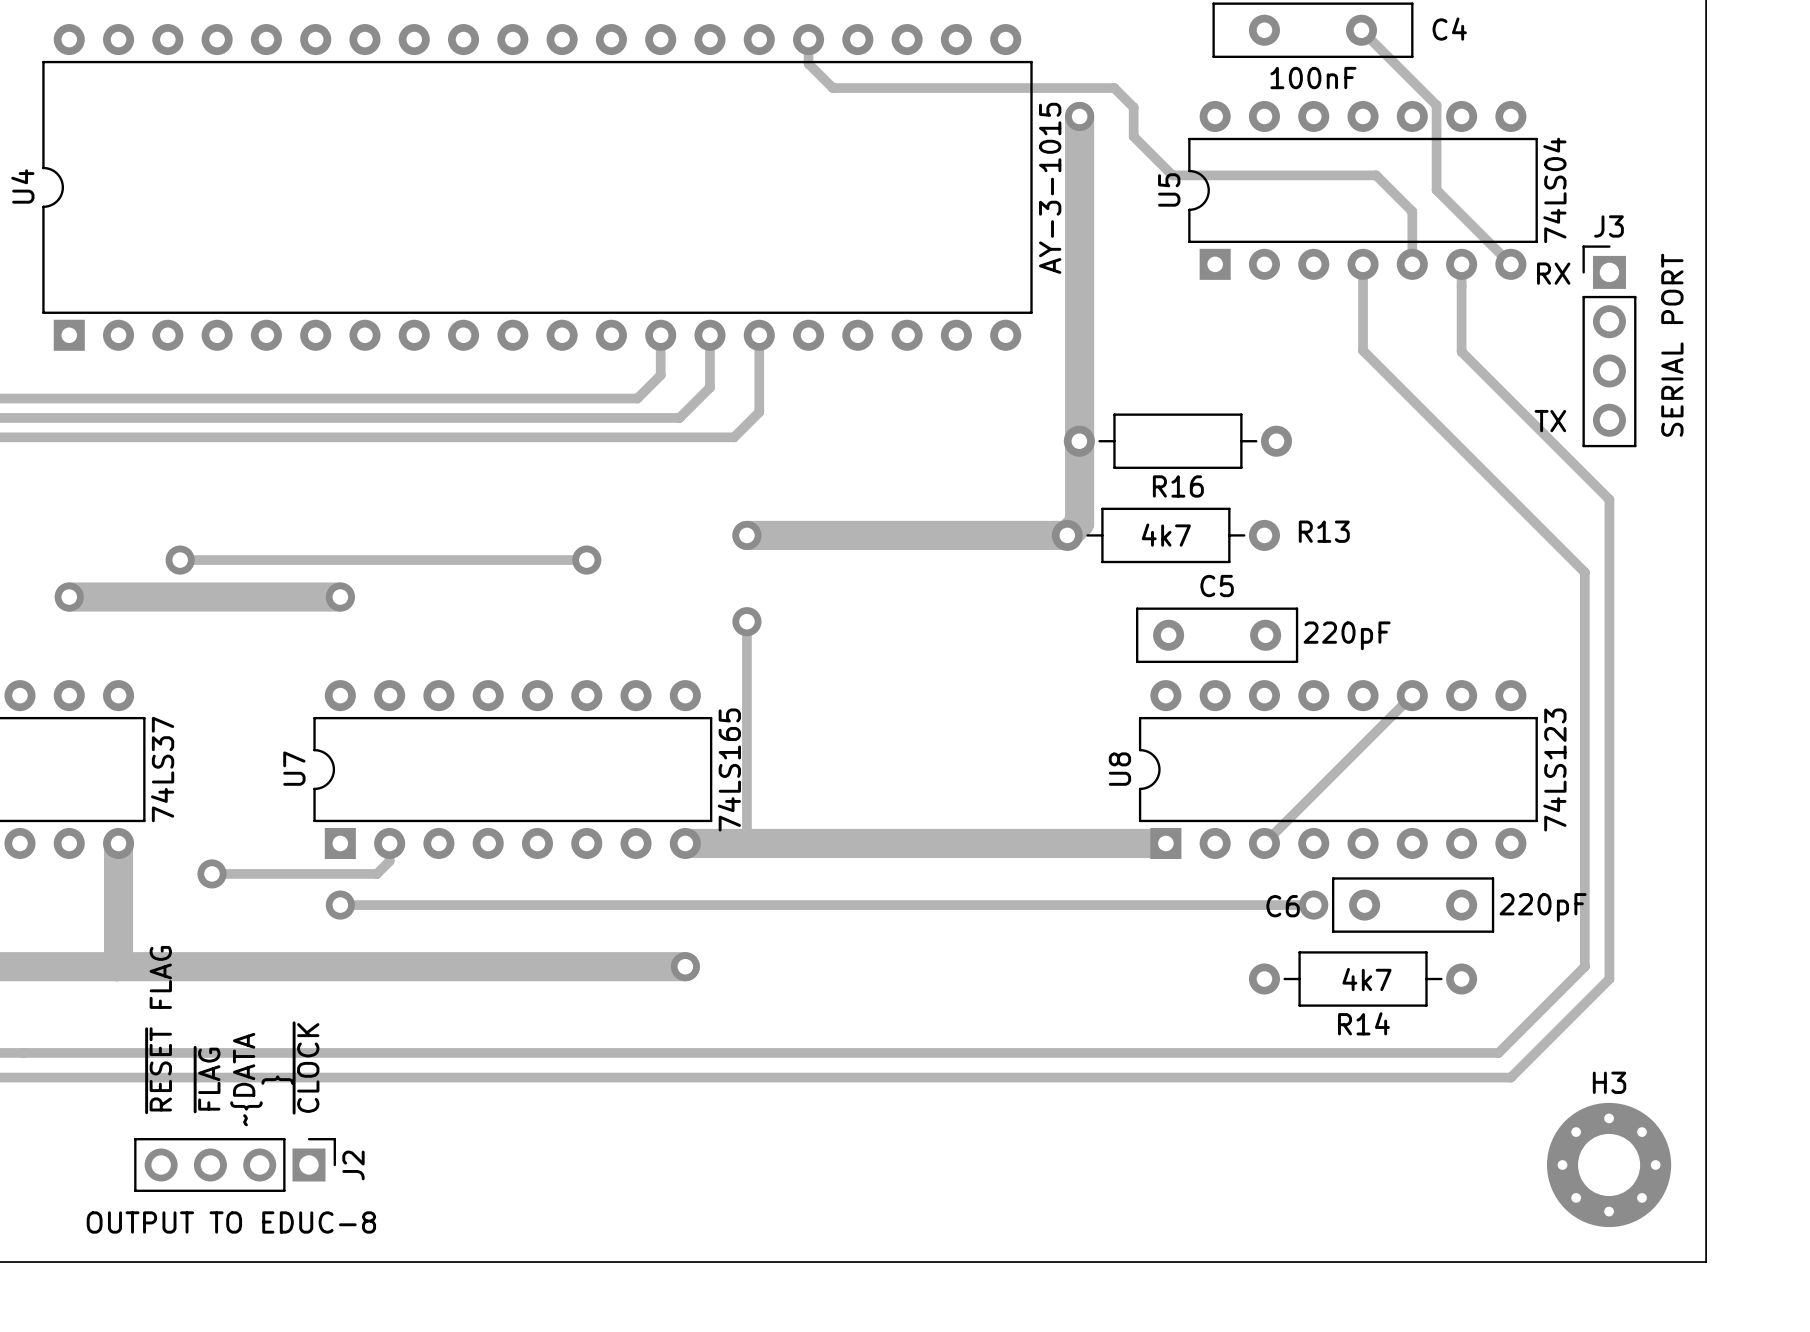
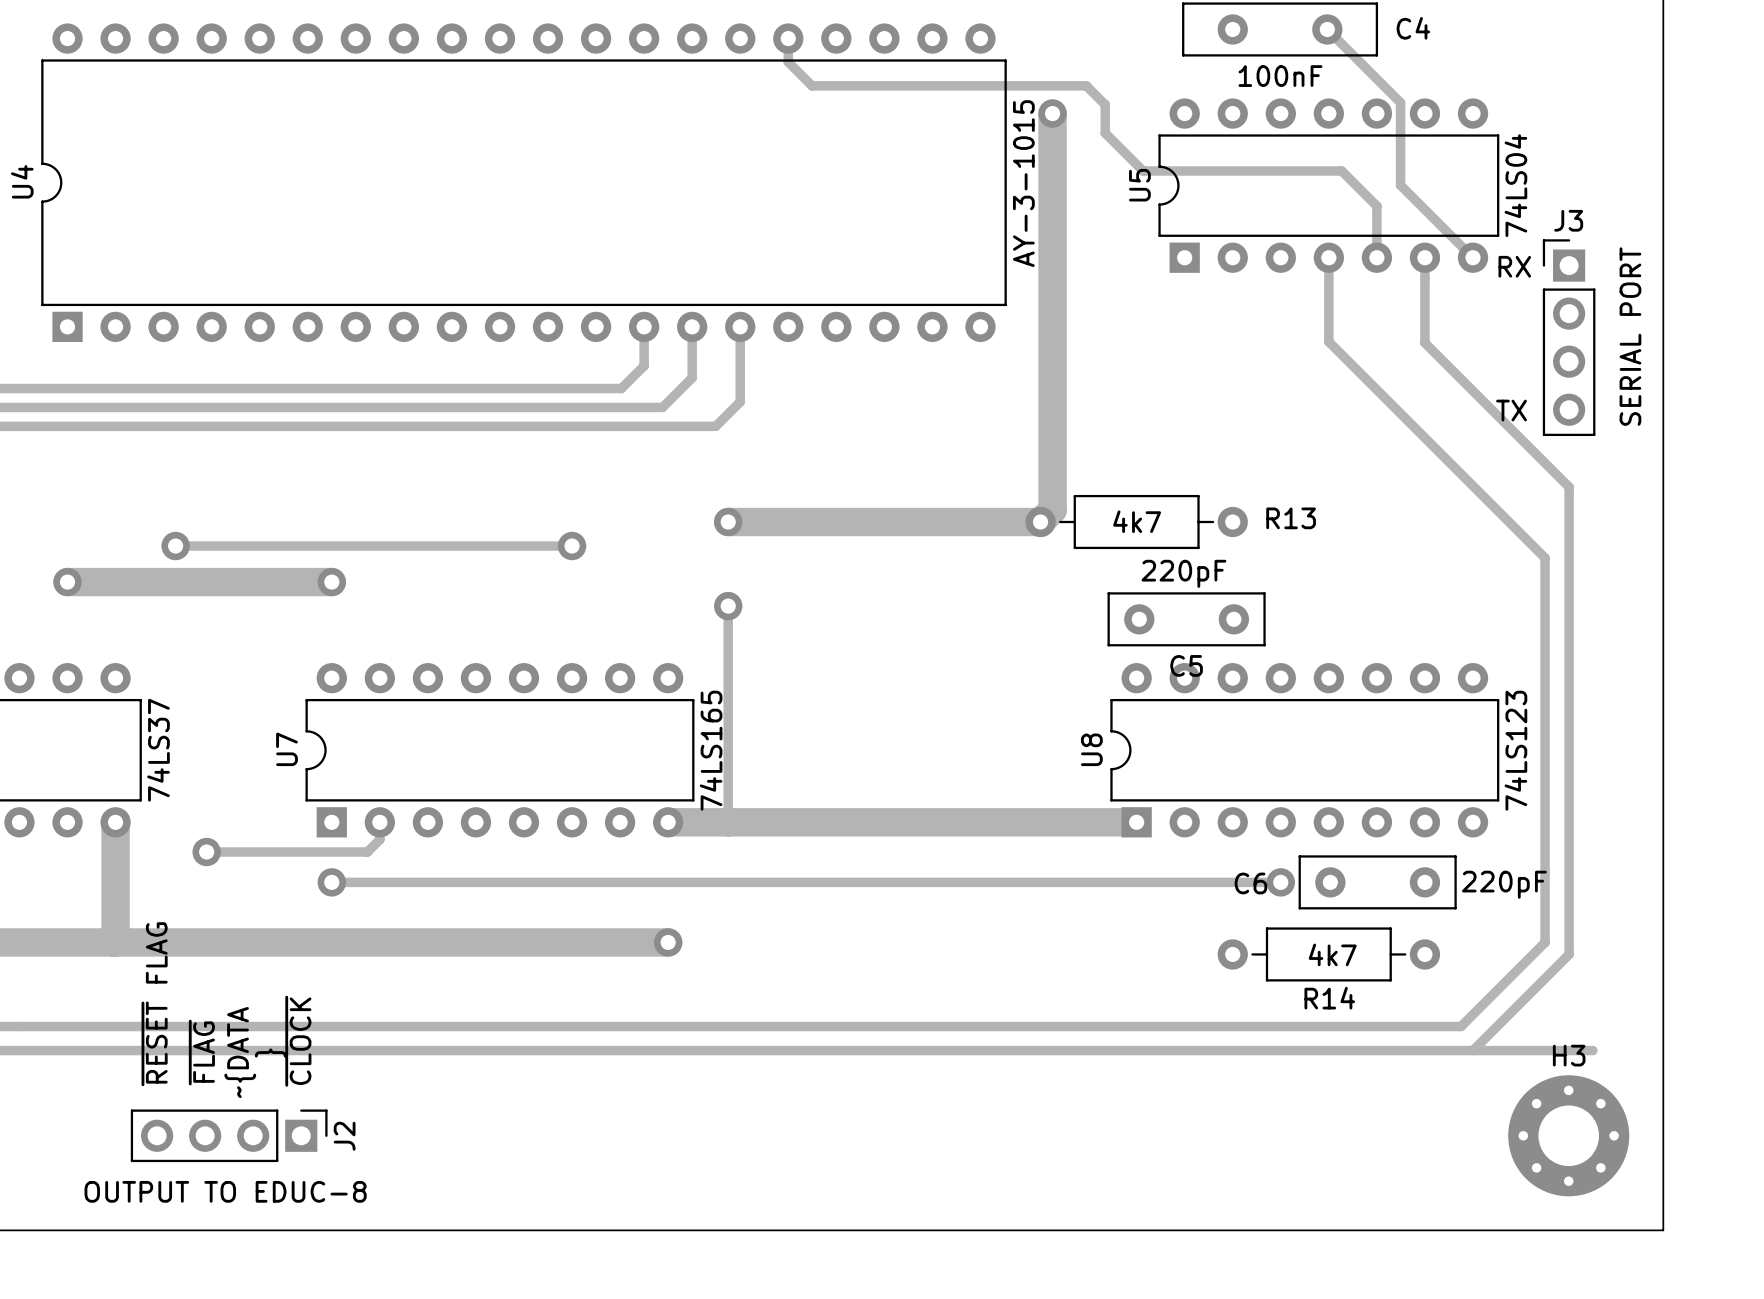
R16: (1177, 441) -> none
C5 name position: C5 (1217, 586) -> C5 (1186, 665)
C5 value position: 220pF (1347, 635) -> 220pF (1183, 573)
track: (1412, 695) (1264, 843) -> none
track: none -> (1473, 1050) (1592, 1050)

